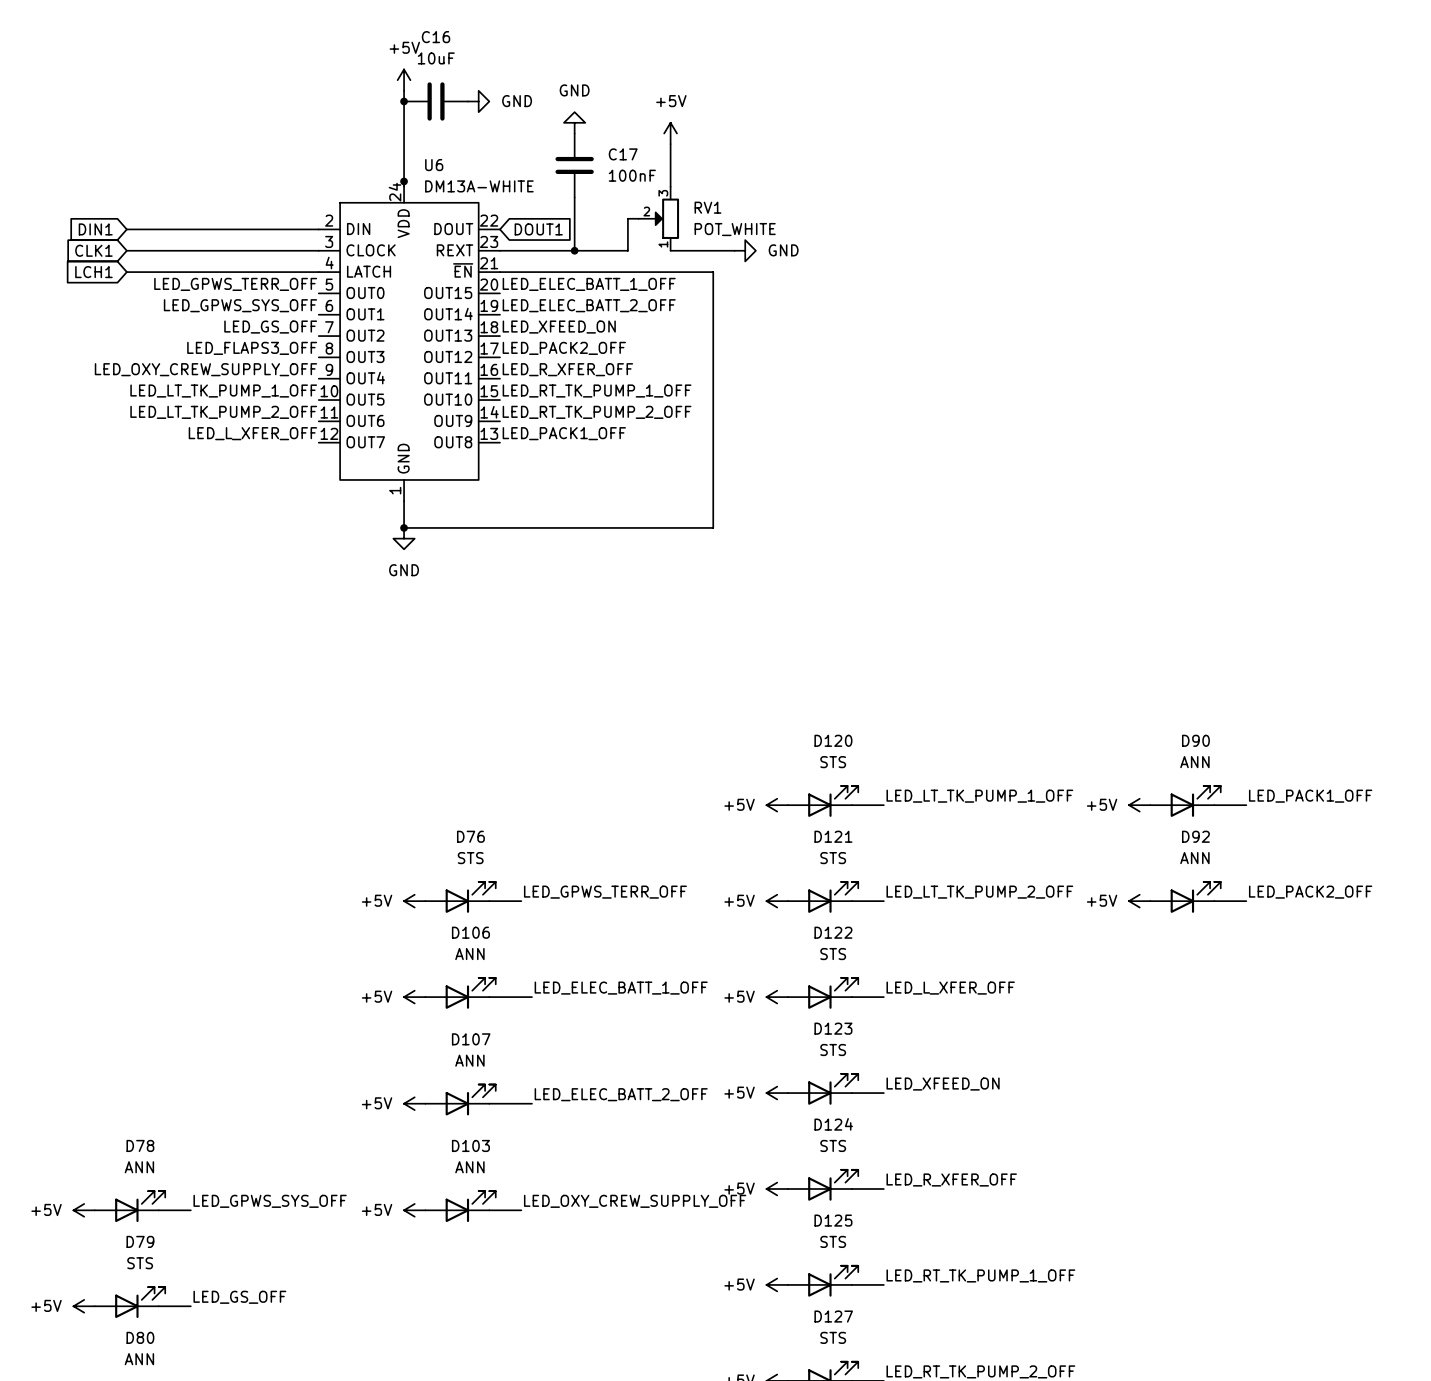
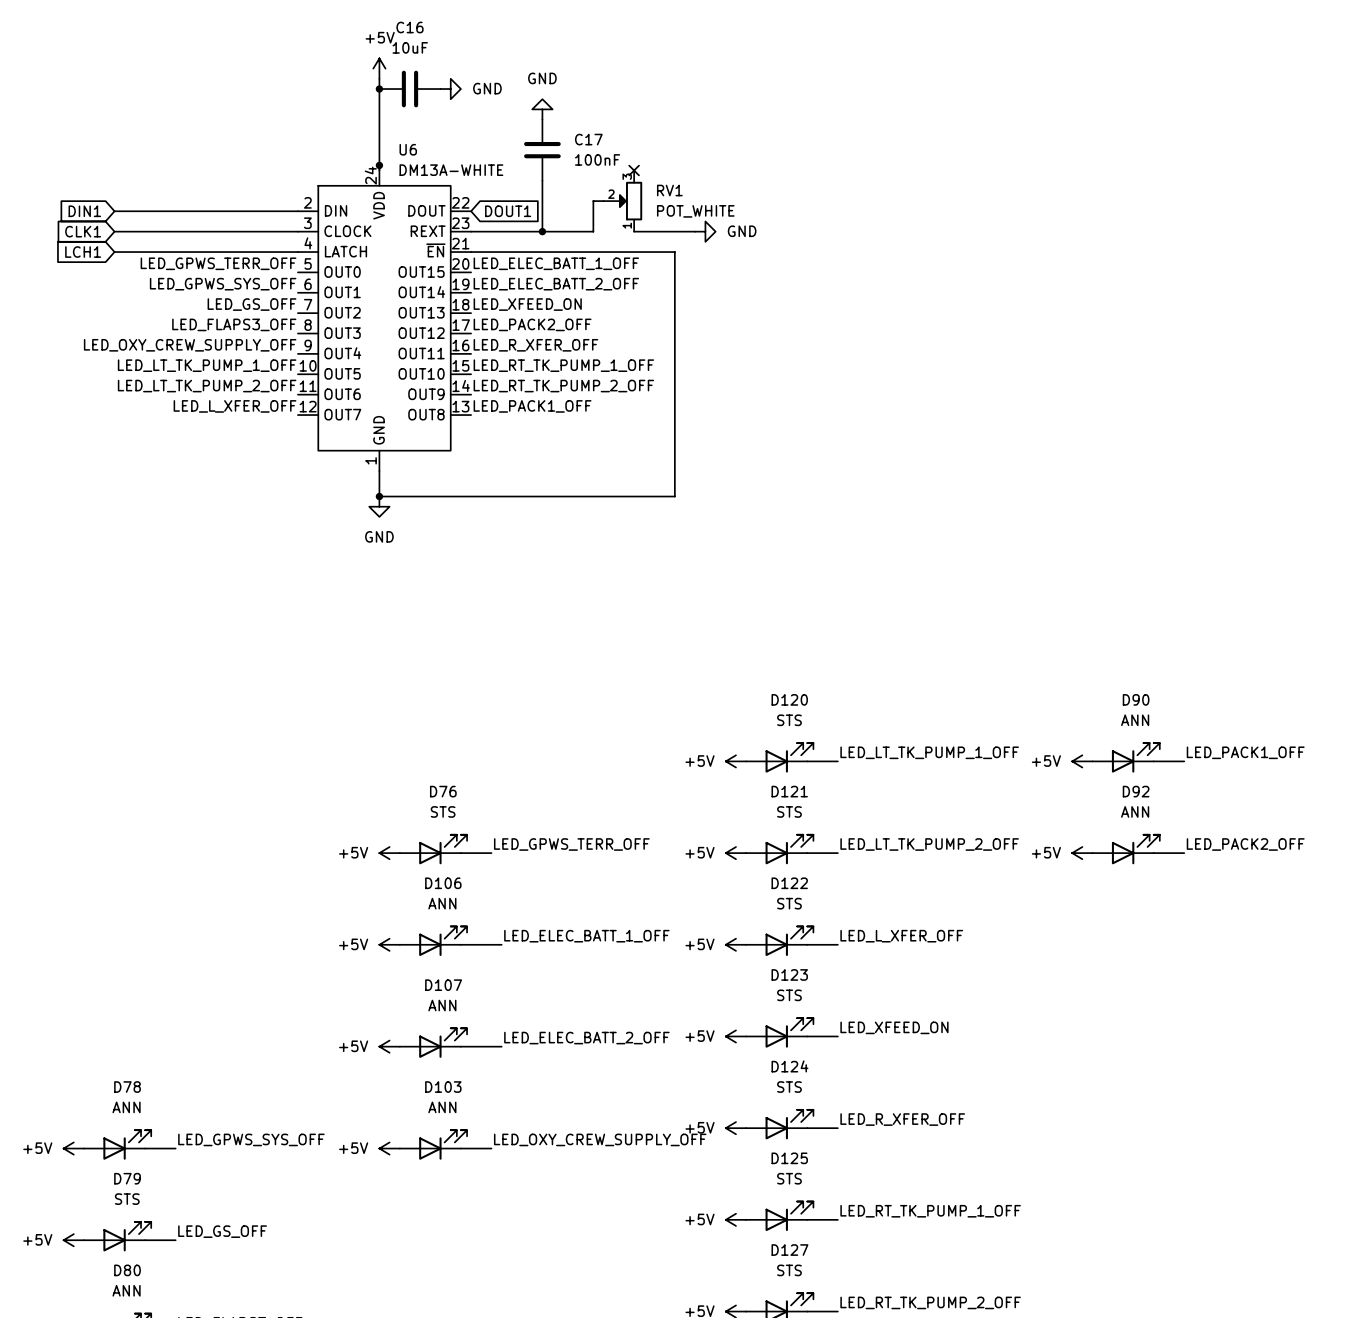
power symbol: +5V (670, 133) -> none
wire: (670, 144) (670, 186) -> none
no-connect mark: none -> (634, 170)

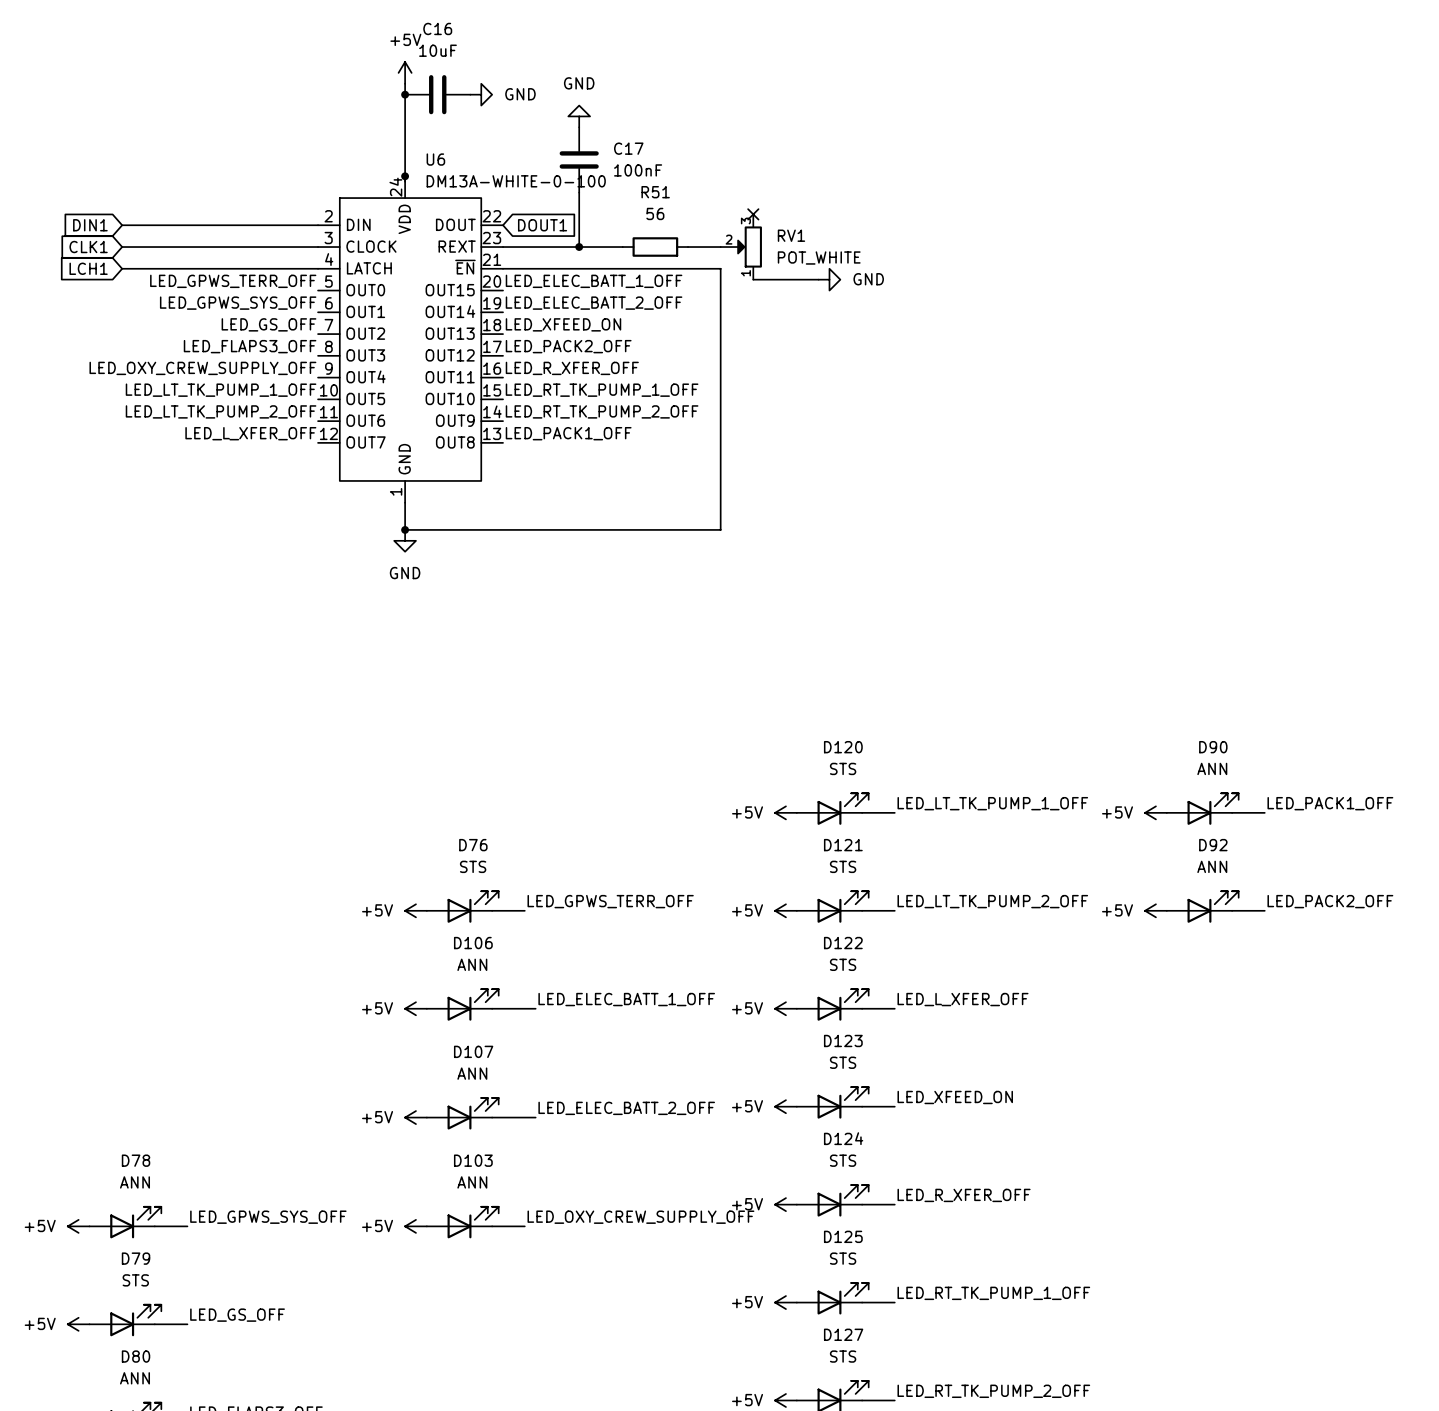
U6 value: DM13A-WHITE (451, 170) -> DM13A-WHITE-0-100 (516, 181)
no-connect mark: (634, 170) -> none
wire: (603, 201) (593, 201) (593, 231) (583, 231) -> none
RV1 position: (622, 201) -> (741, 247)
no-connect mark: none -> (753, 214)
R51: none -> 56 (655, 247)
power symbol position: GND (705, 231) -> GND (829, 279)
wire: none -> (753, 279) (818, 279)

